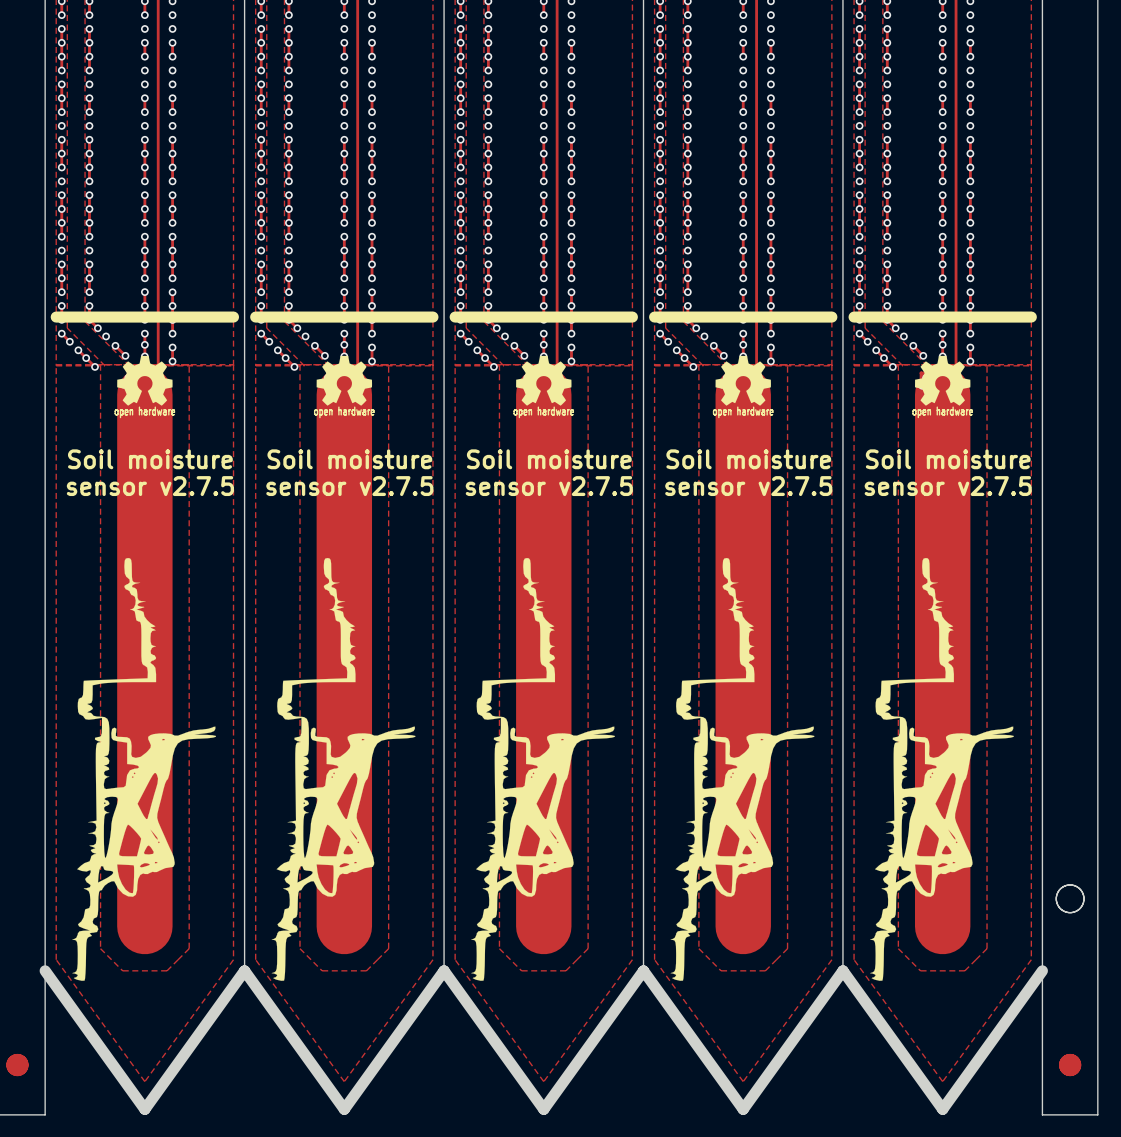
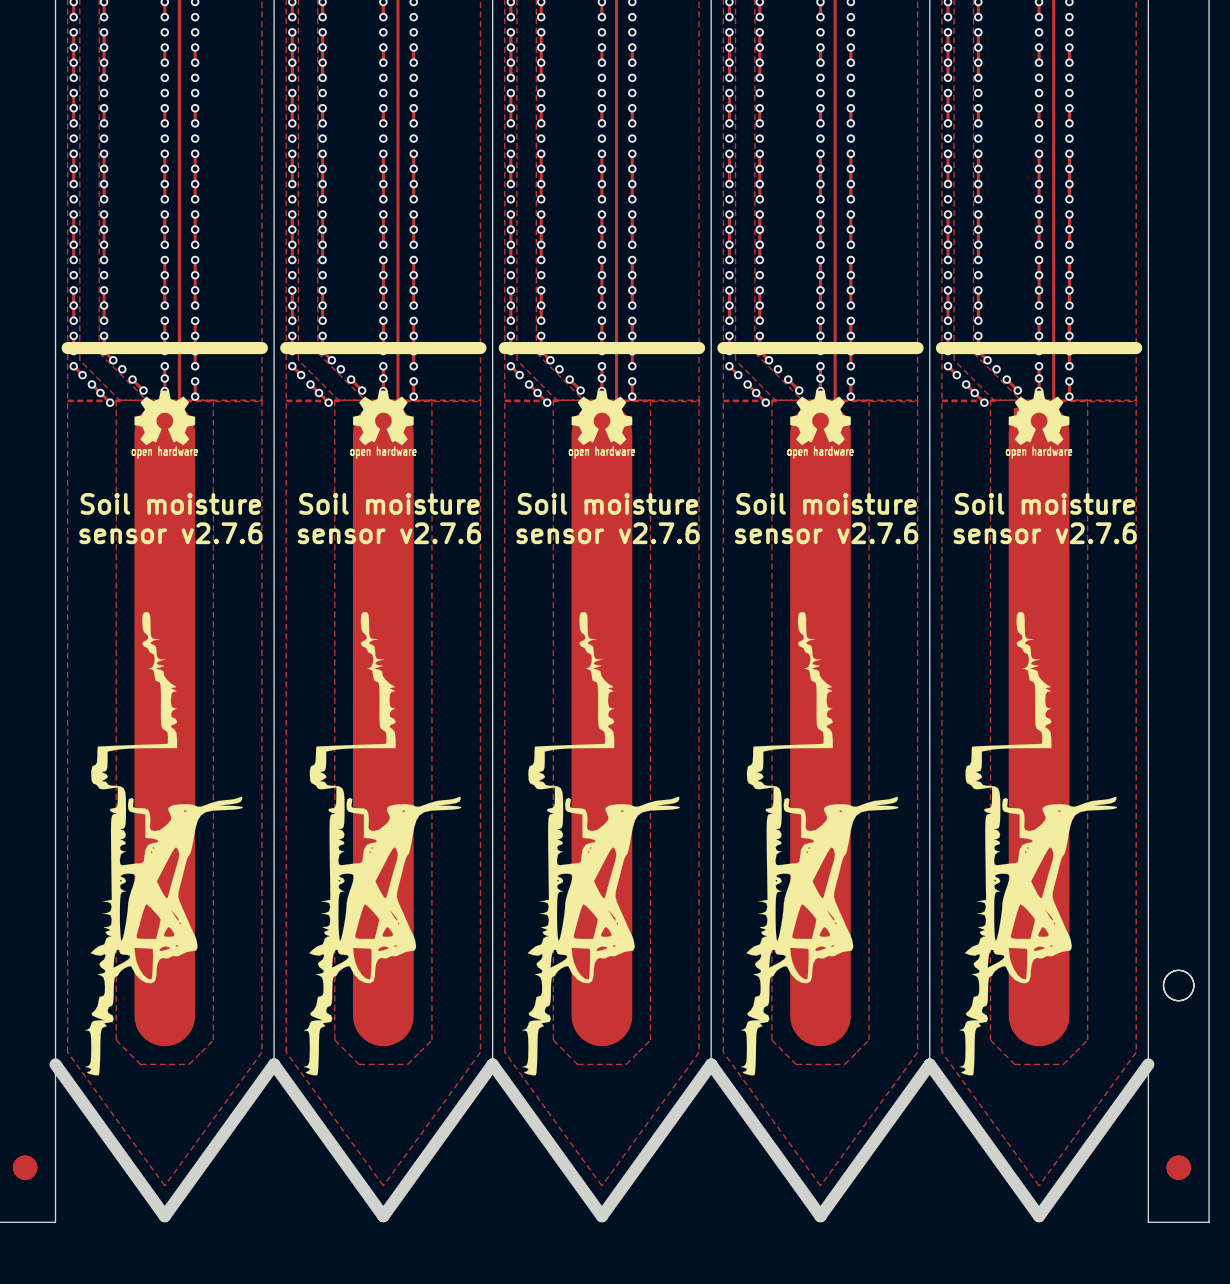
text: sensor v2.7.5 (150, 486) -> sensor v2.7.6 (170, 533)
text: sensor v2.7.5 (349, 486) -> sensor v2.7.6 (389, 533)
text: sensor v2.7.5 (549, 486) -> sensor v2.7.6 (607, 533)
text: sensor v2.7.5 (748, 486) -> sensor v2.7.6 (826, 533)
text: sensor v2.7.5 (948, 486) -> sensor v2.7.6 (1045, 533)

